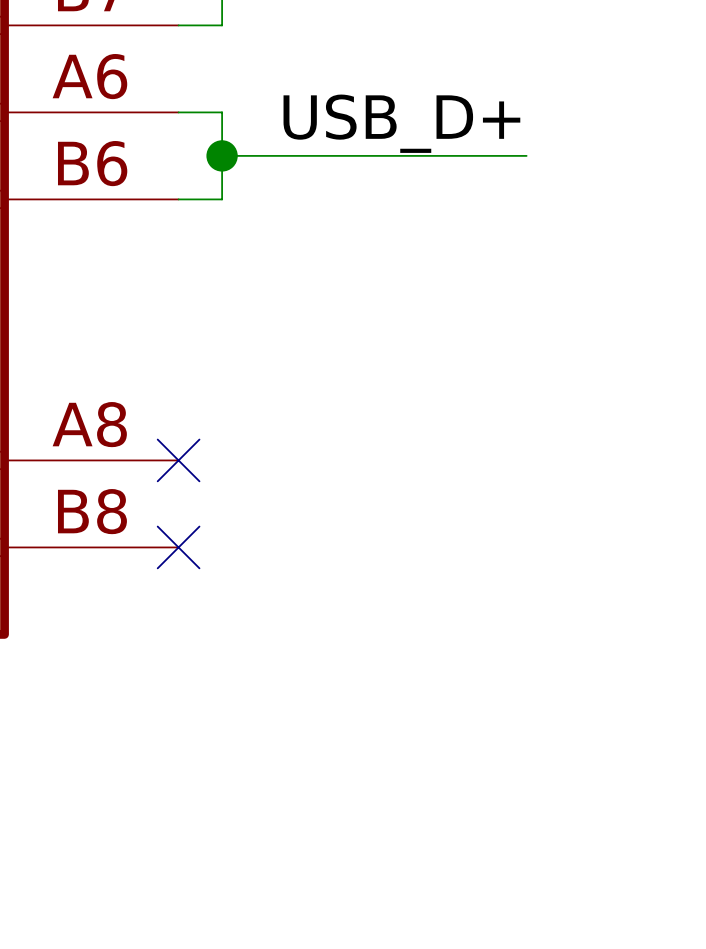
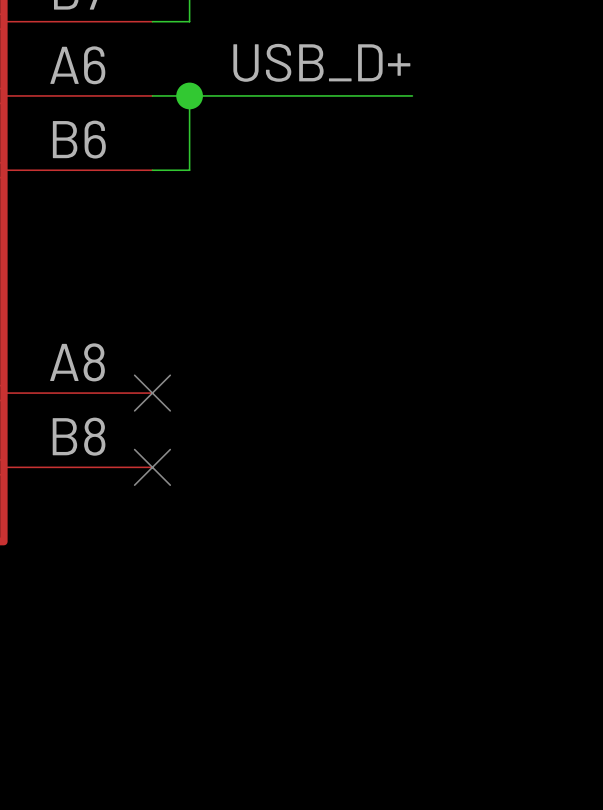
wire: none -> (189, 95) (412, 95)
label position: USB_D+ (401, 123) -> USB_D+ (321, 62)
wire: (222, 155) (526, 155) -> none
junction position: (222, 155) -> (189, 95)

